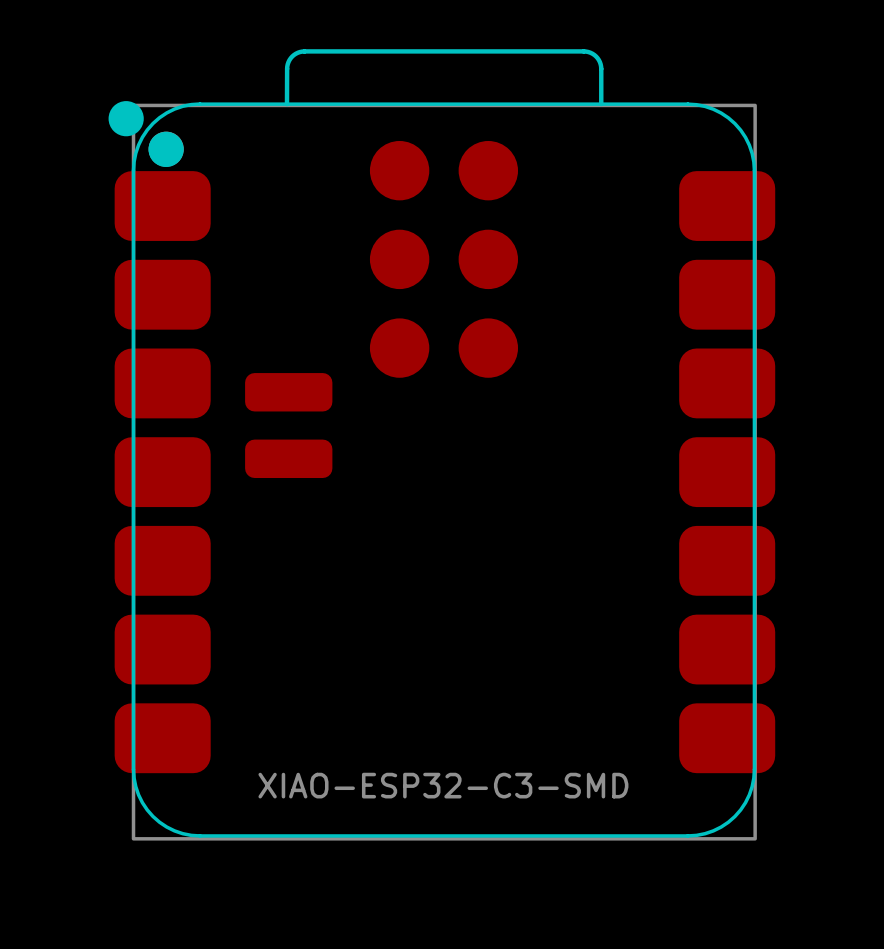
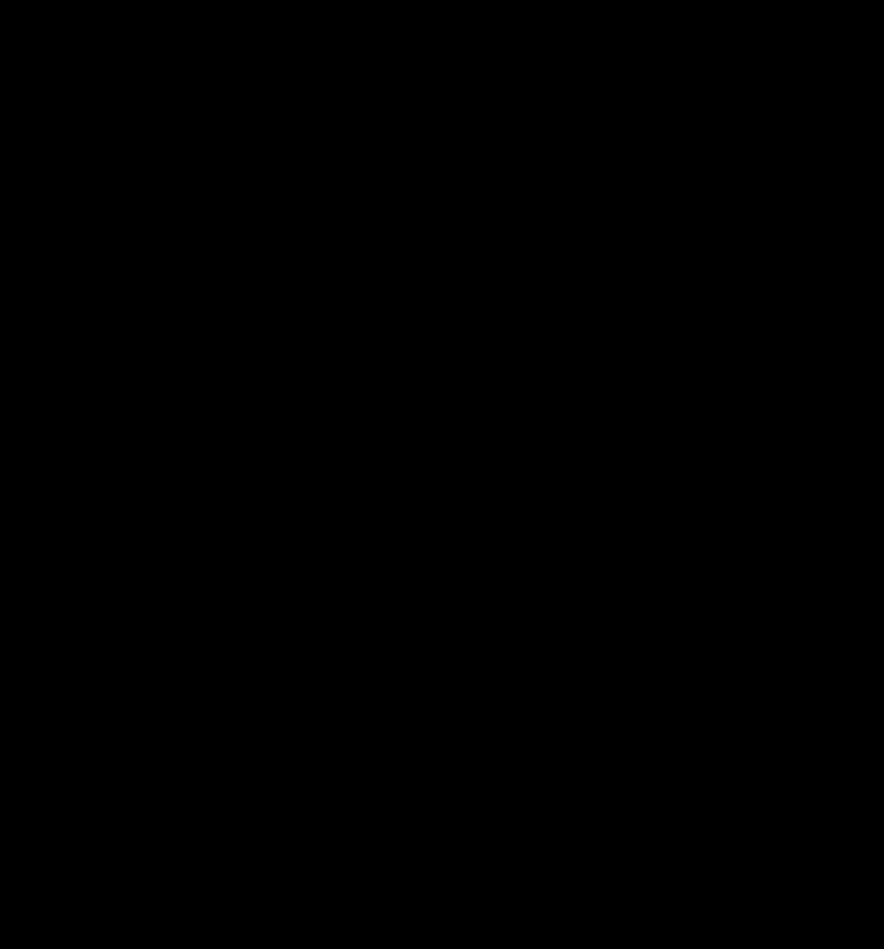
part: XIAO-ESP32-C3-SMD (441, 444) -> none

